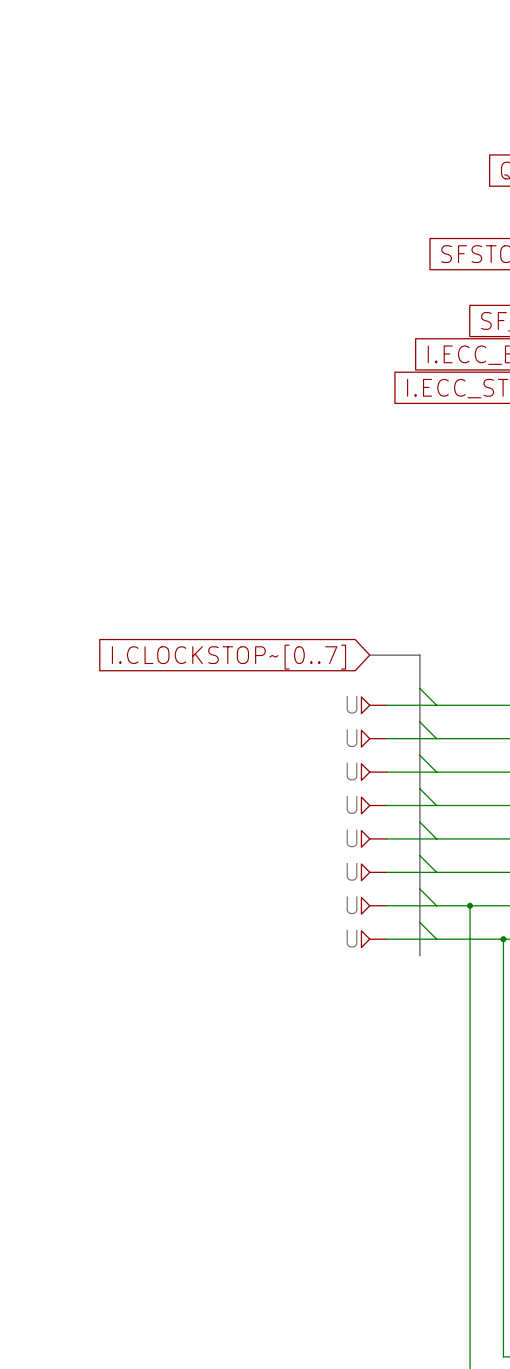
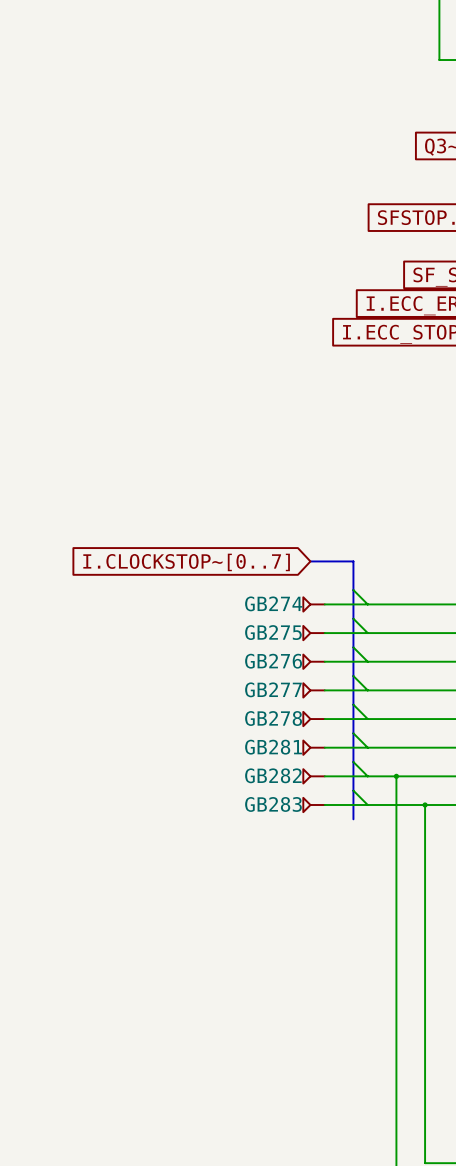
U name: U (352, 704) -> GB274 (273, 603)
U name: U (352, 738) -> GB275 (273, 632)
U name: U (352, 771) -> GB276 (273, 661)
U name: U (352, 804) -> GB277 (273, 689)
U name: U (352, 838) -> GB278 (273, 718)
U name: U (352, 871) -> GB281 (273, 747)
U name: U (352, 905) -> GB282 (273, 775)
U name: U (352, 938) -> GB283 (273, 804)

